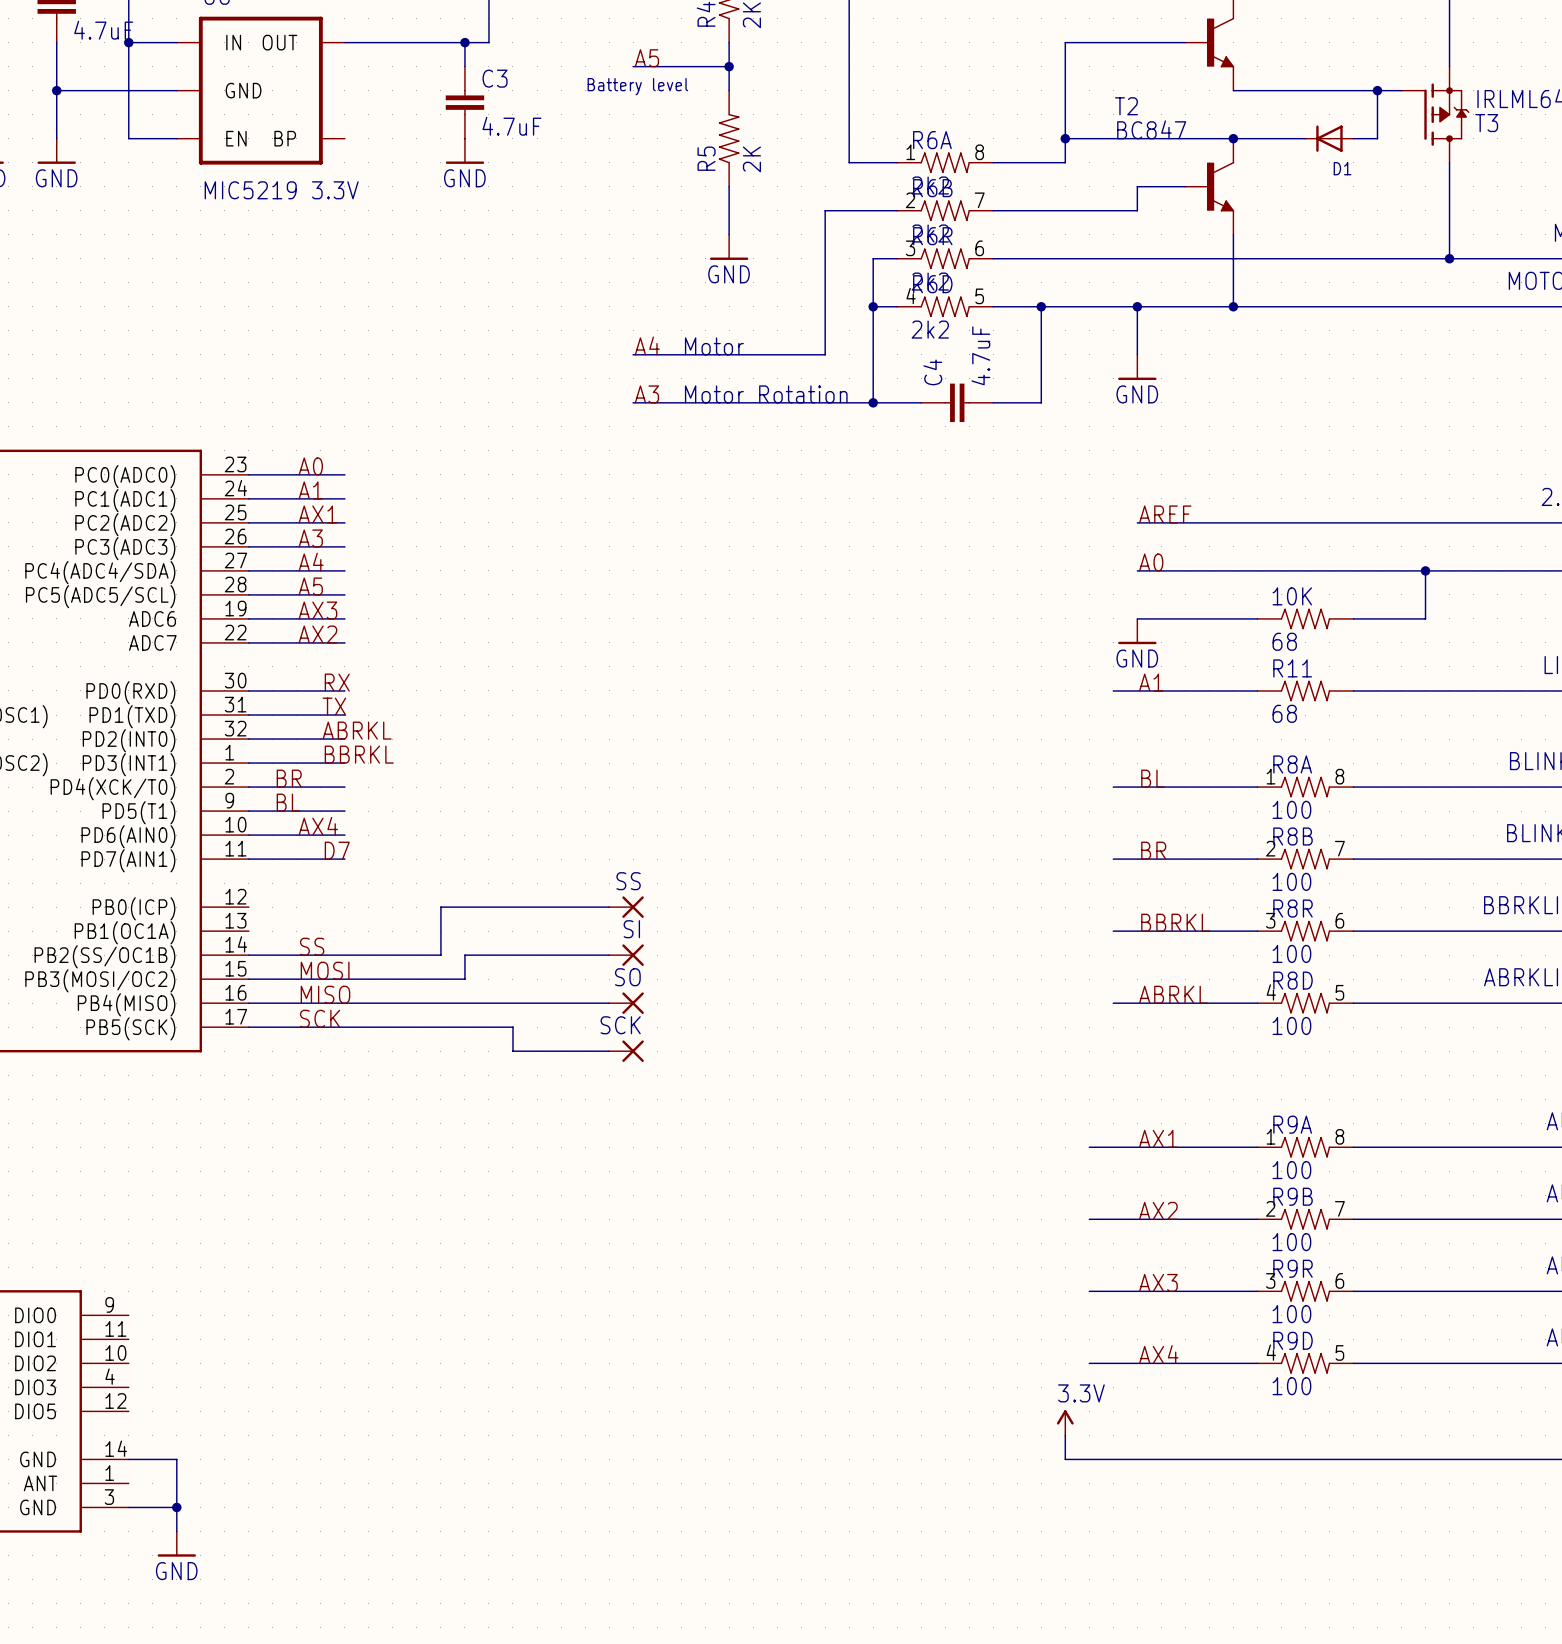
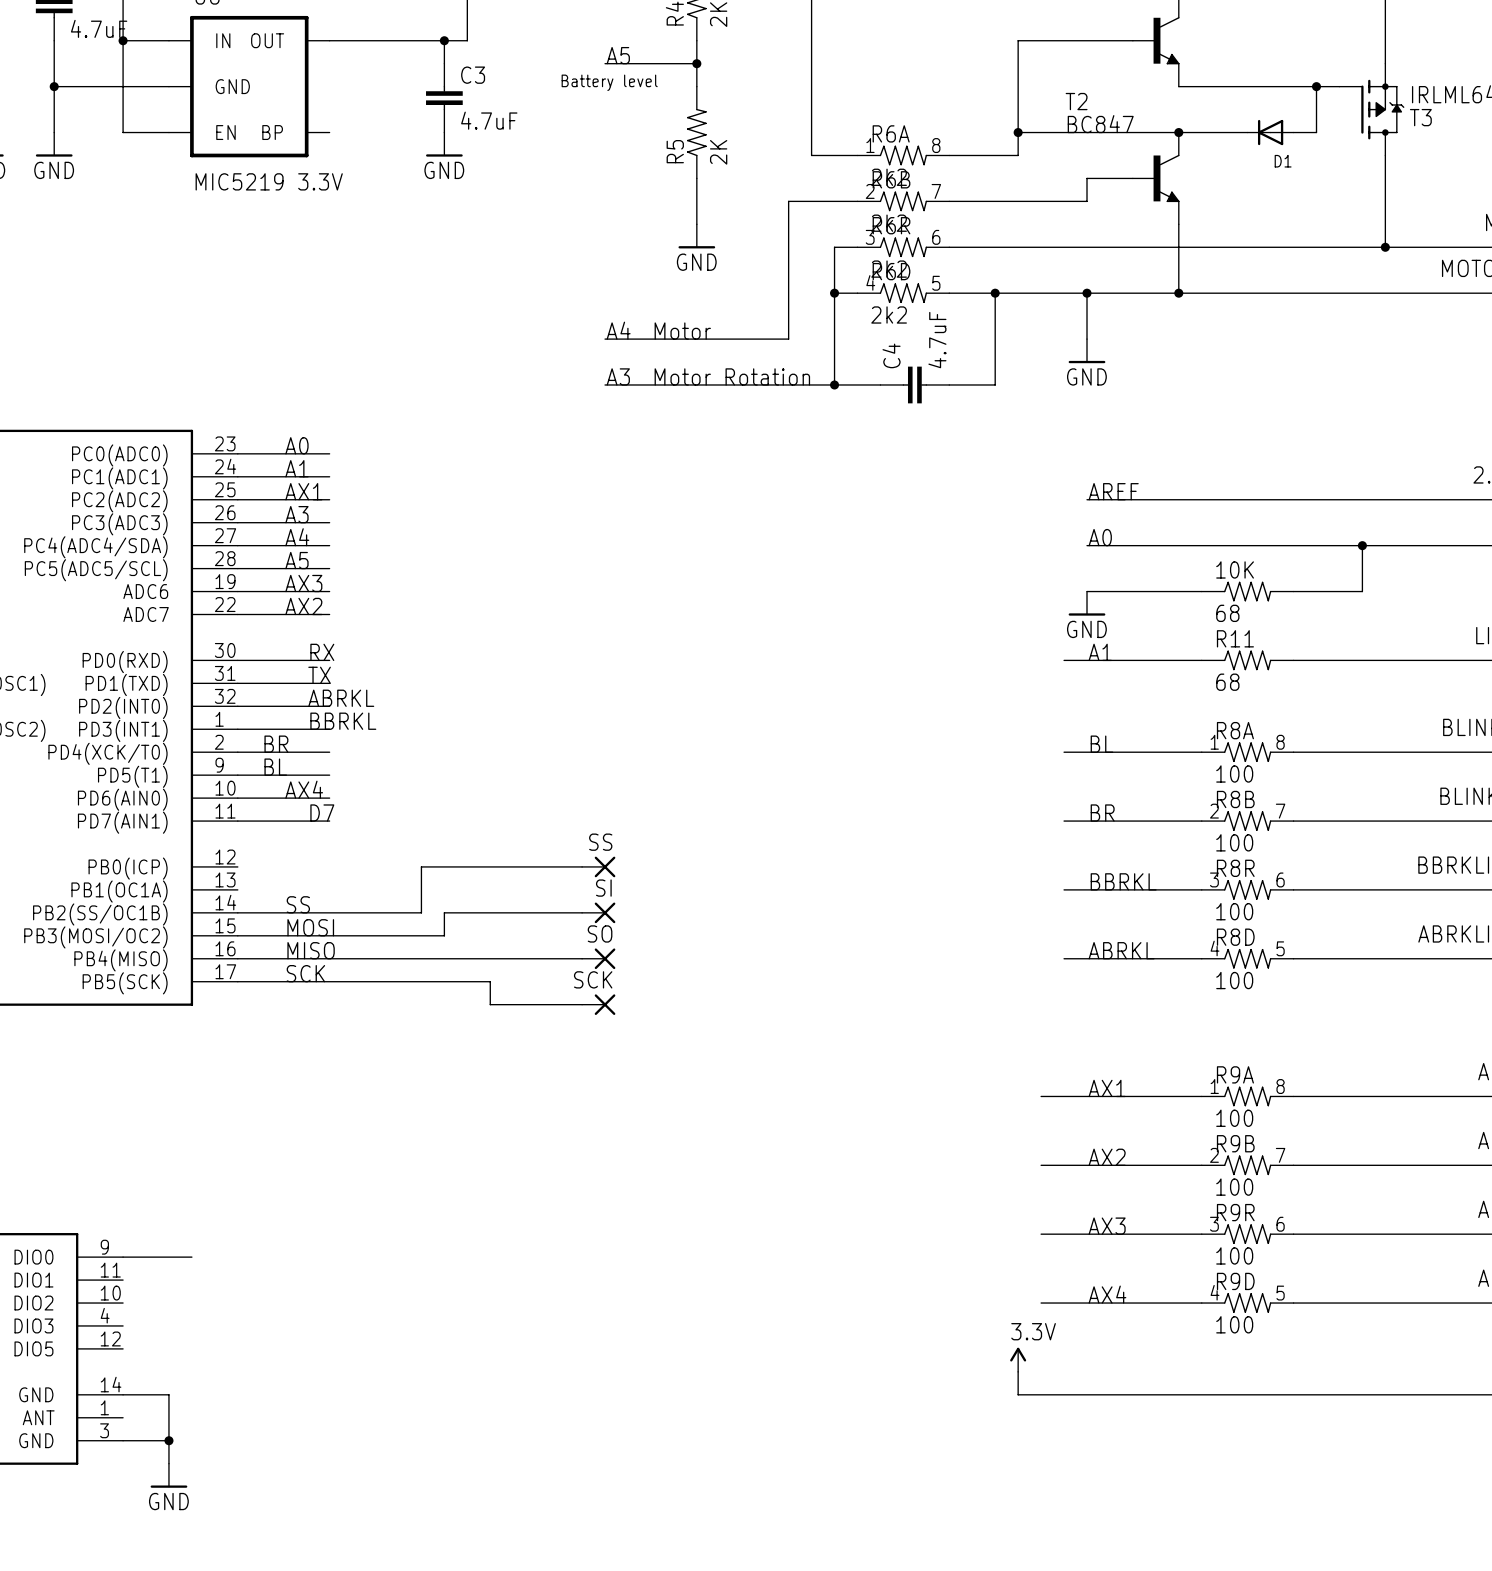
wire: none -> (123, 1257) (191, 1257)

